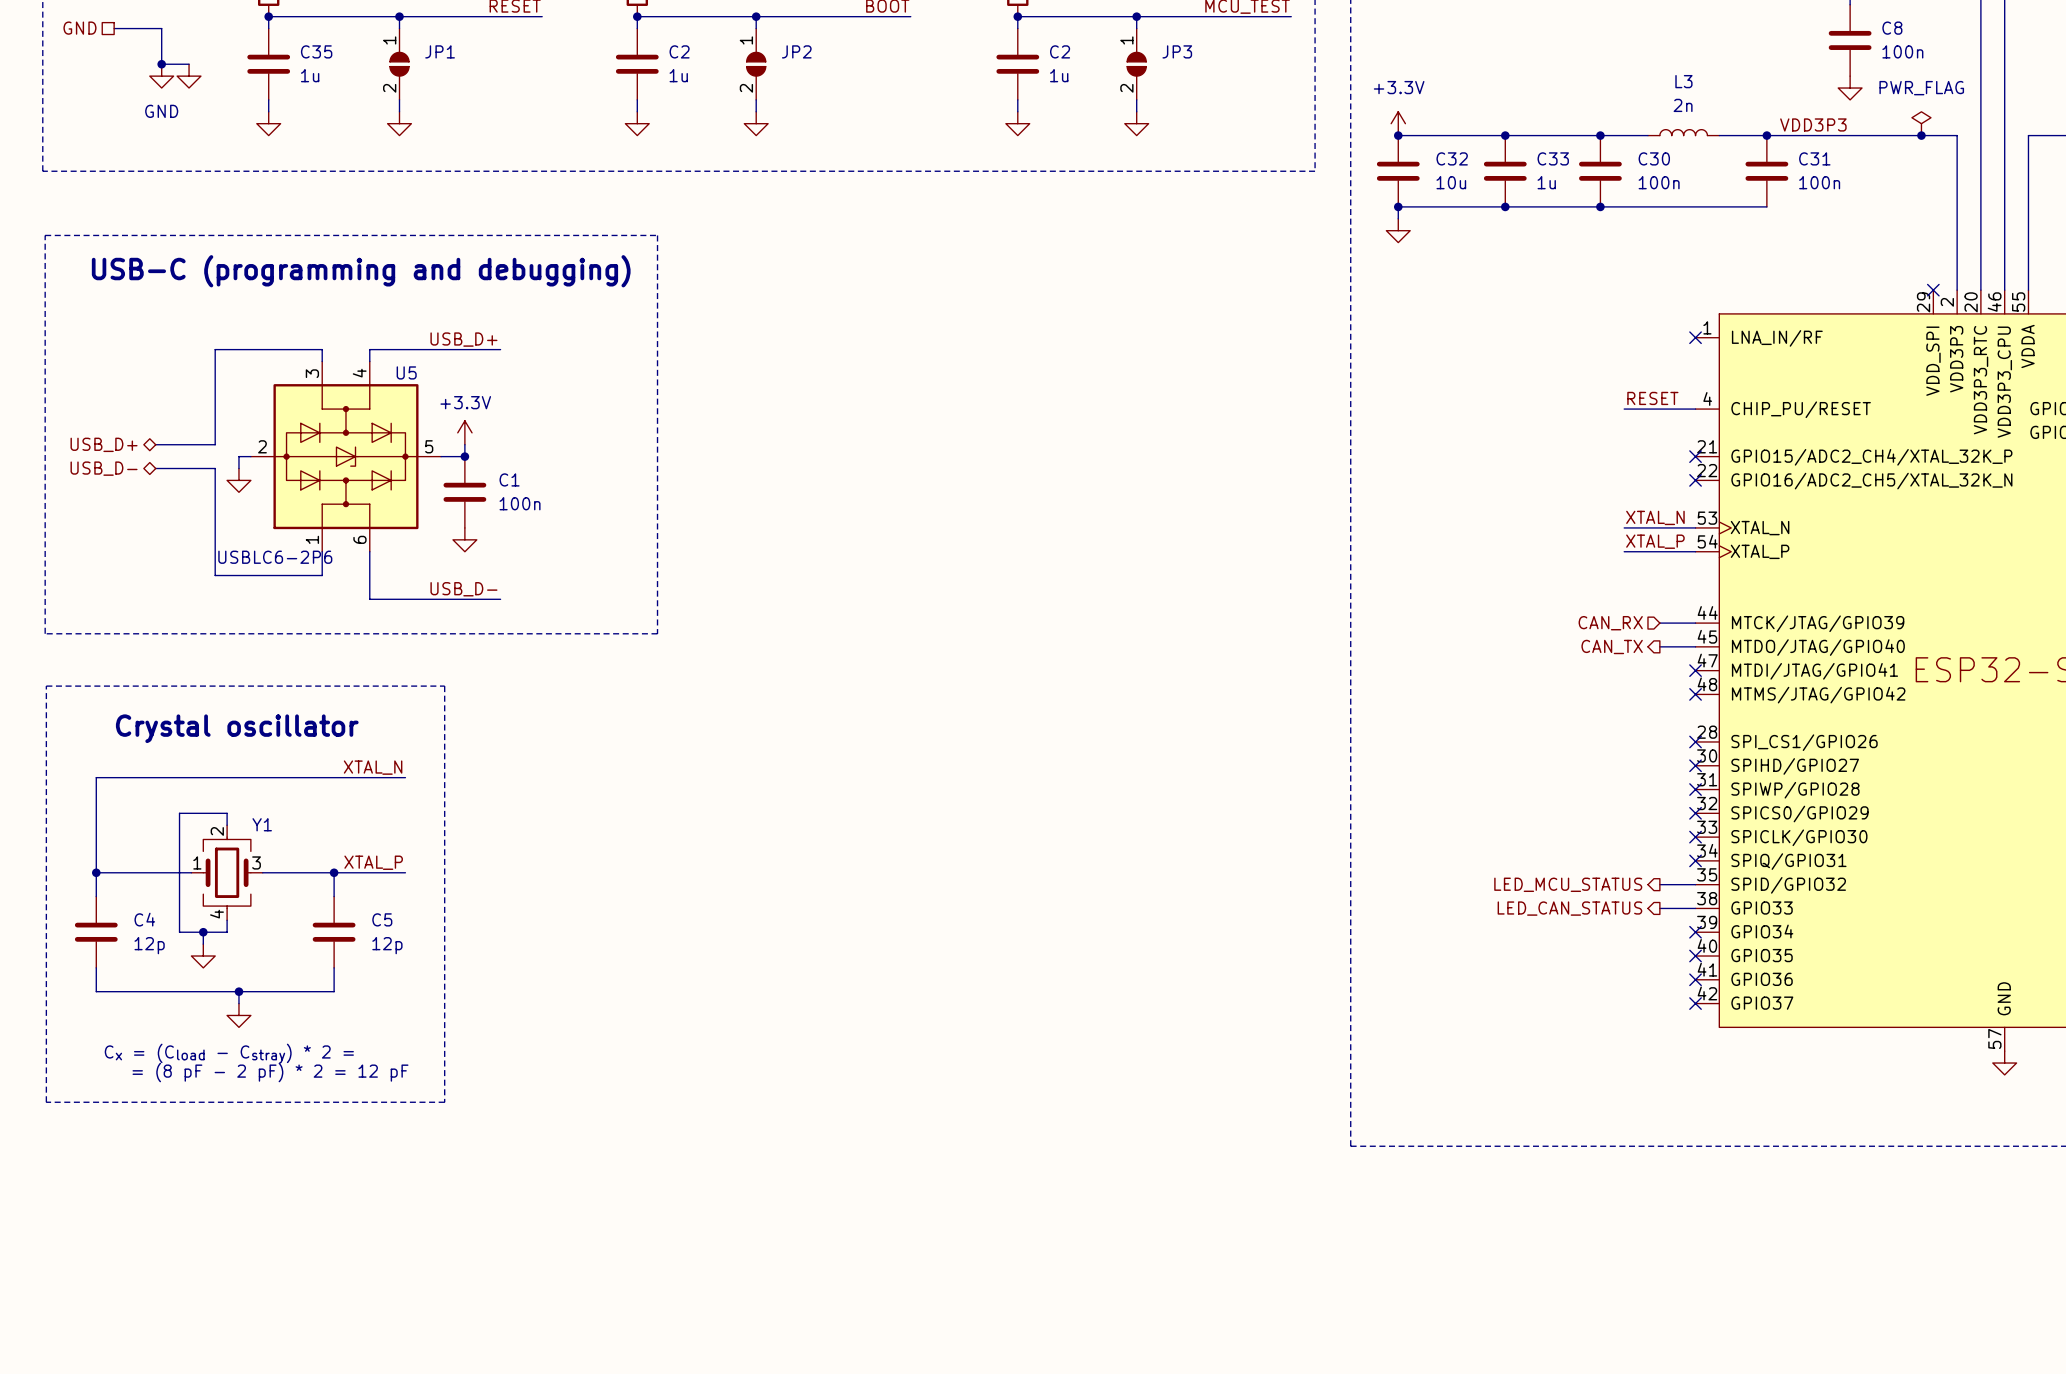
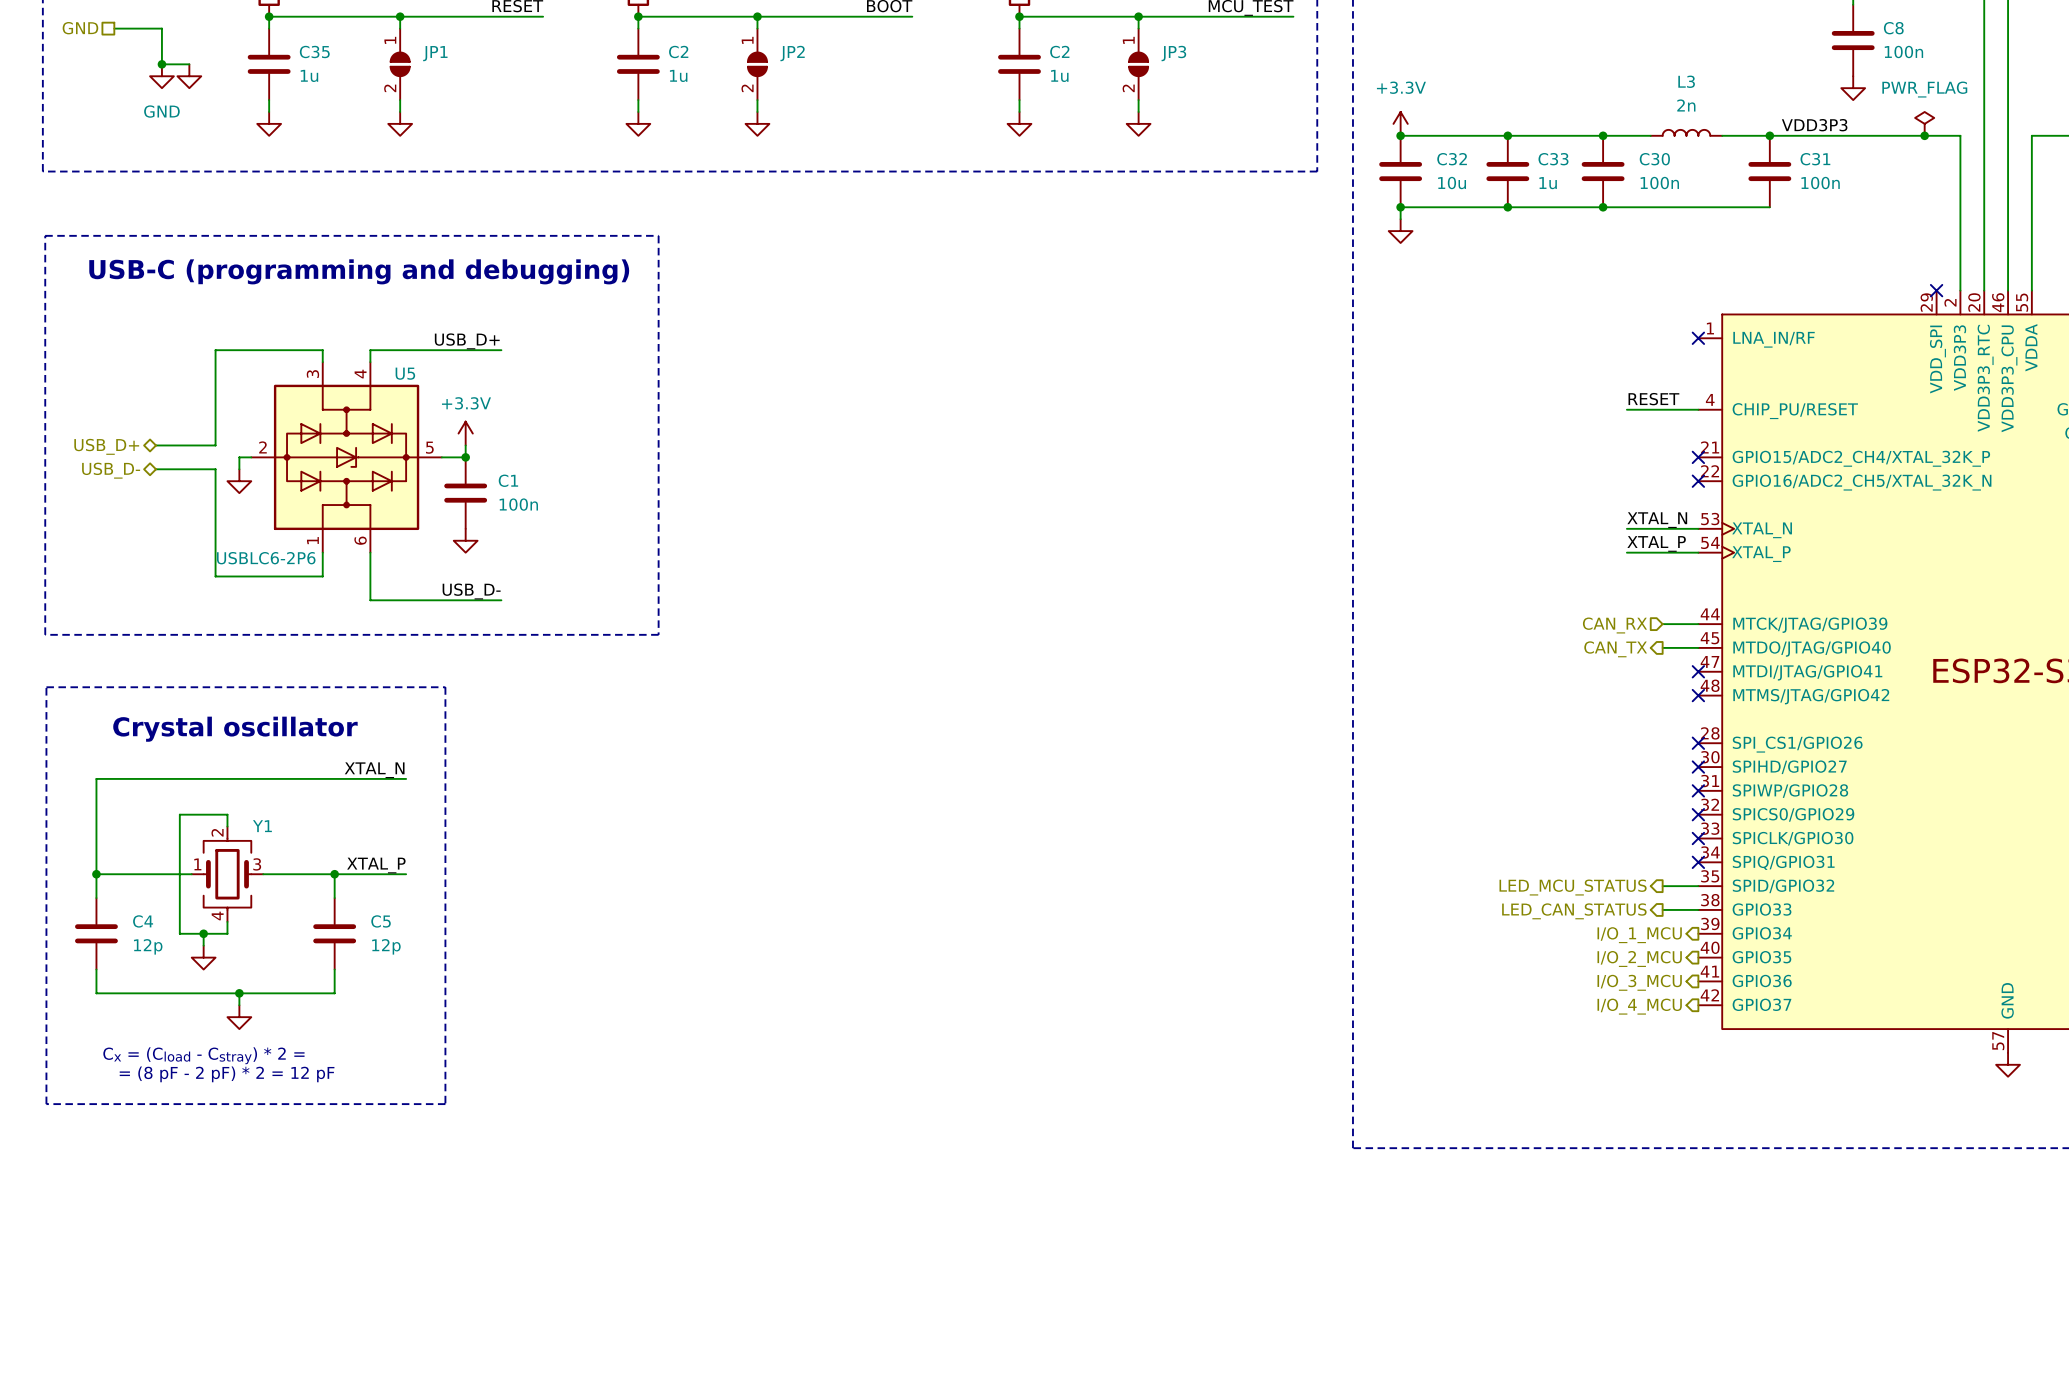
hierarchical label: none -> I/O_1_MCU (1639, 935)
no-connect mark: (1695, 932) -> none
hierarchical label: none -> I/O_2_MCU (1639, 958)
no-connect mark: (1695, 956) -> none
no-connect mark: (1695, 979) -> none
hierarchical label: none -> I/O_3_MCU (1639, 982)
no-connect mark: (1695, 1003) -> none
hierarchical label: none -> I/O_4_MCU (1639, 1006)

